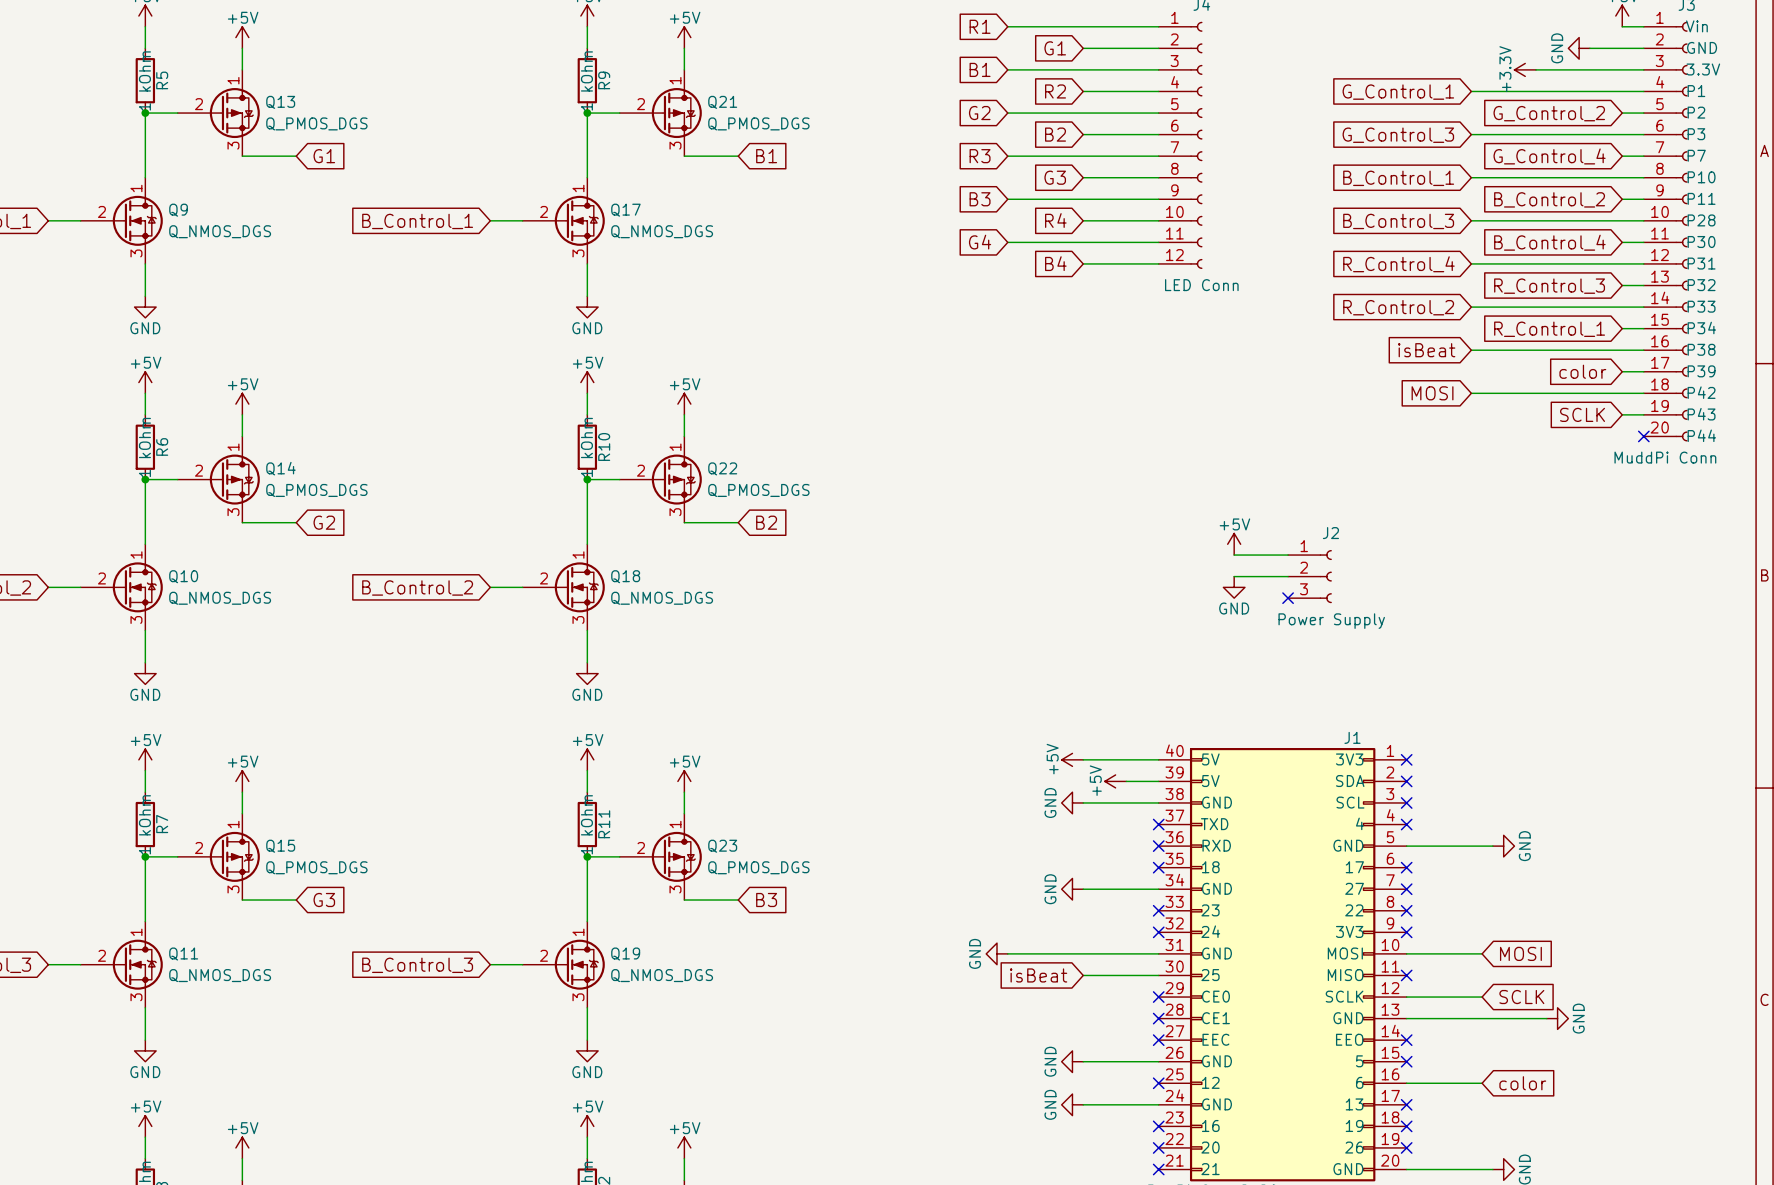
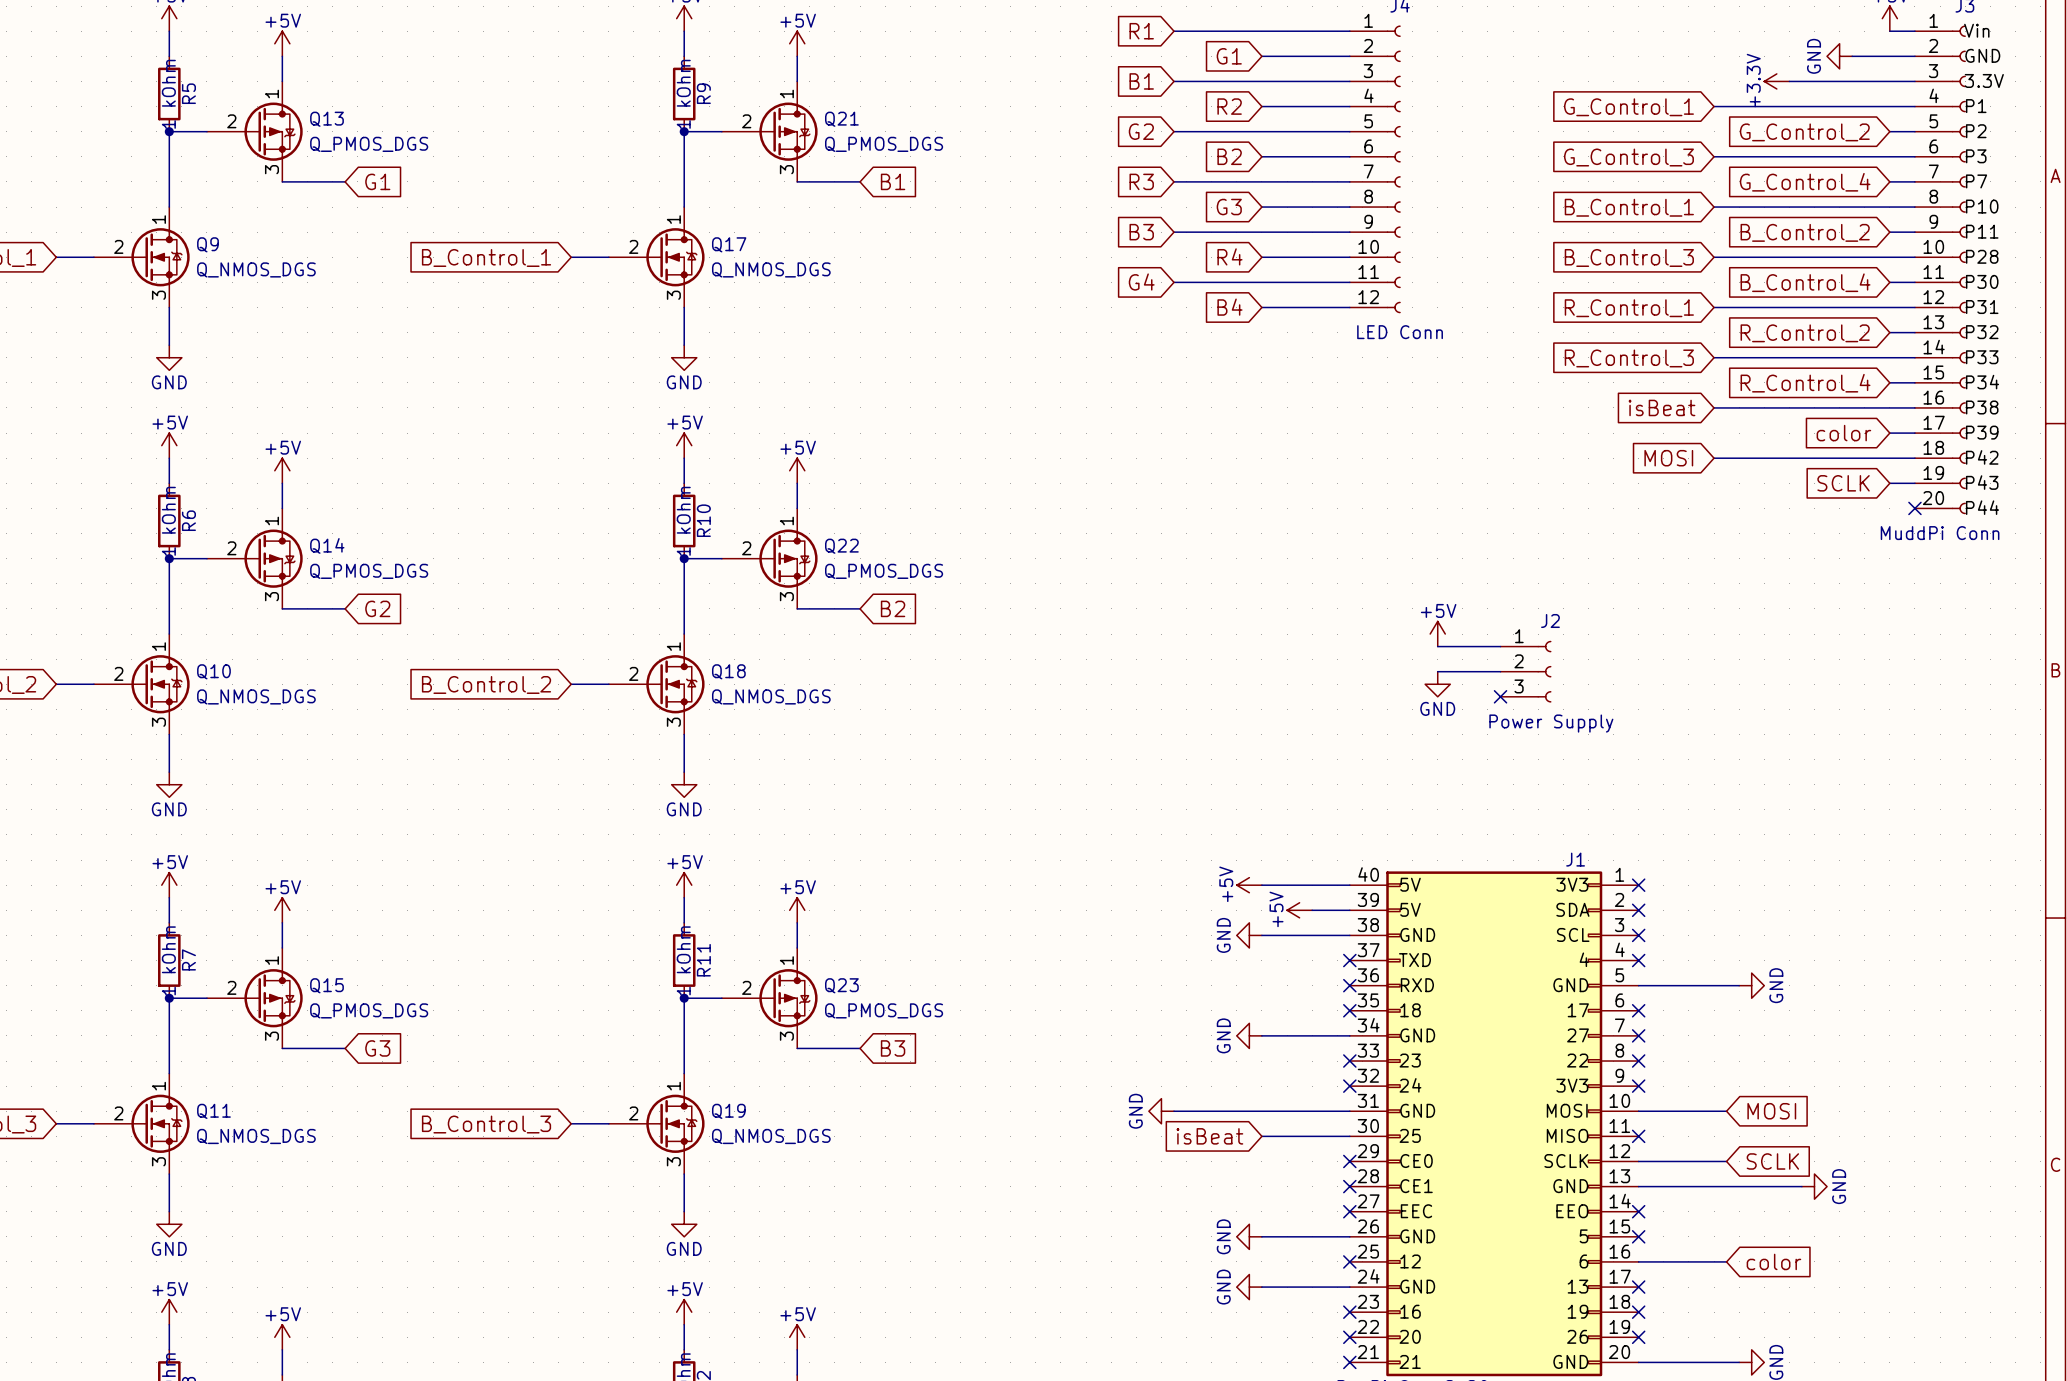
global label: R_Control_4 (1398, 264) -> R_Control_1 (1629, 308)
global label: R_Control_3 (1549, 286) -> R_Control_2 (1805, 333)
global label: R_Control_2 (1398, 307) -> R_Control_3 (1629, 358)
global label: R_Control_1 (1549, 329) -> R_Control_4 (1805, 383)

